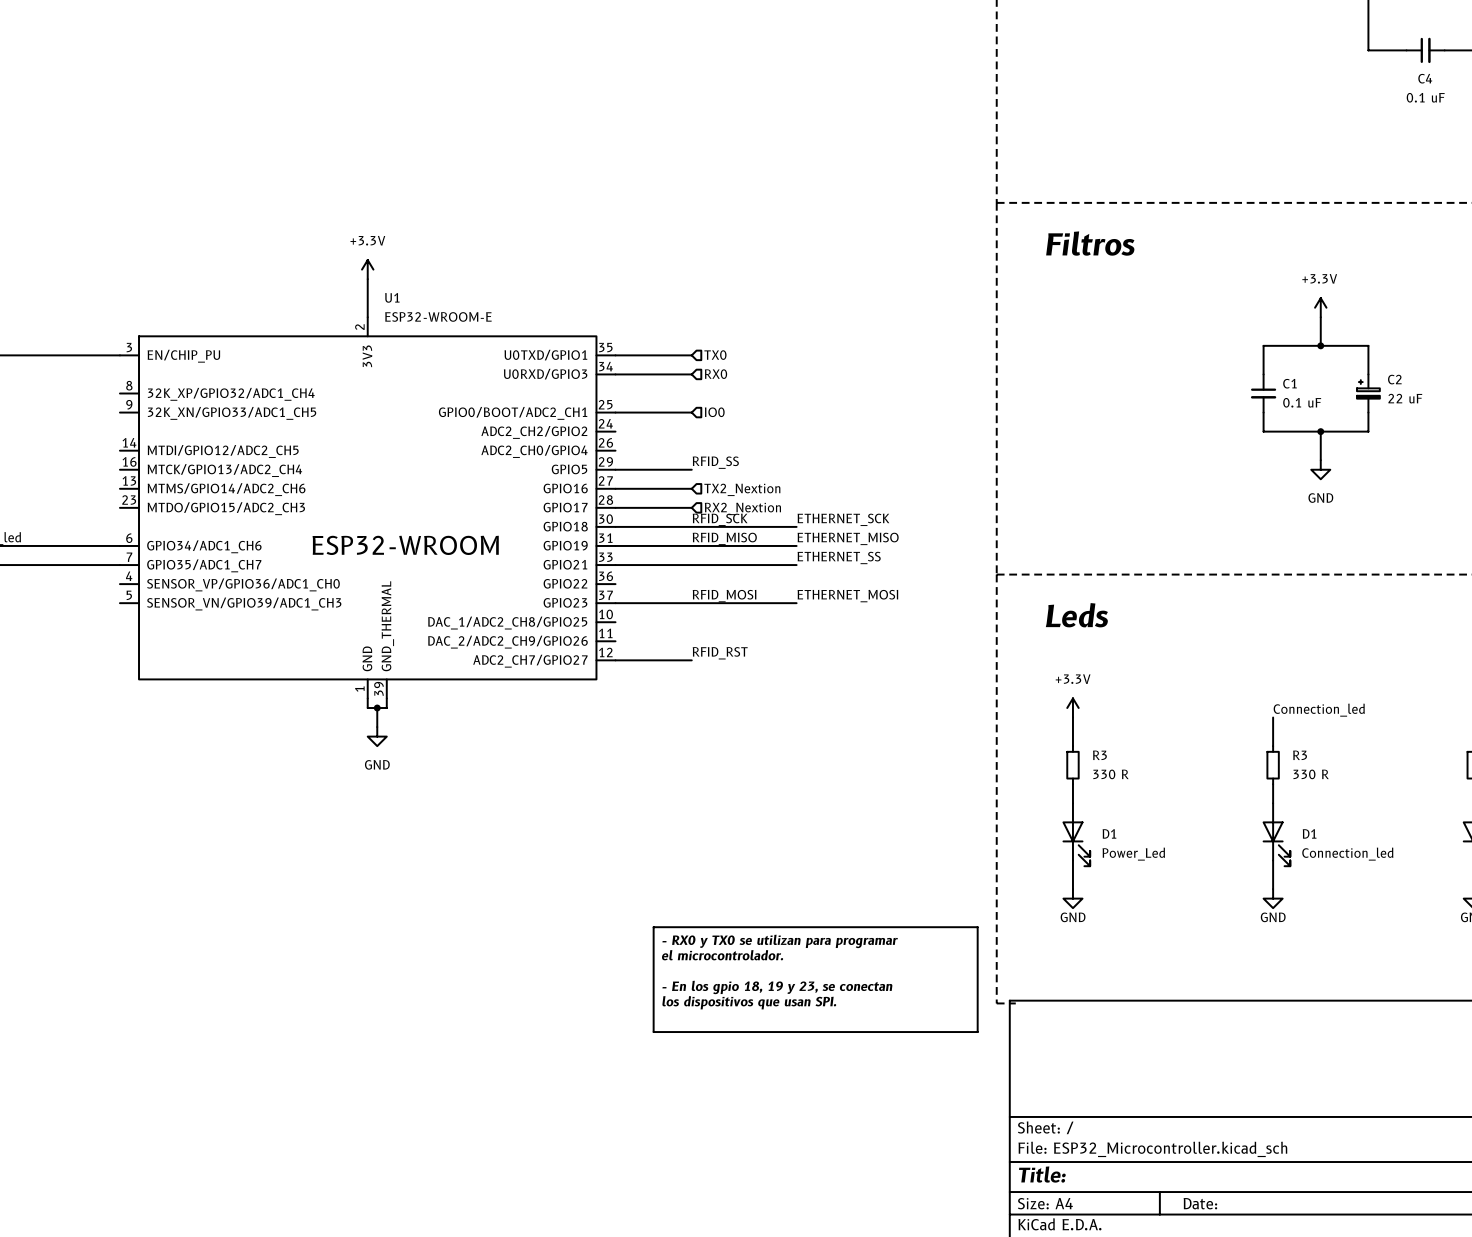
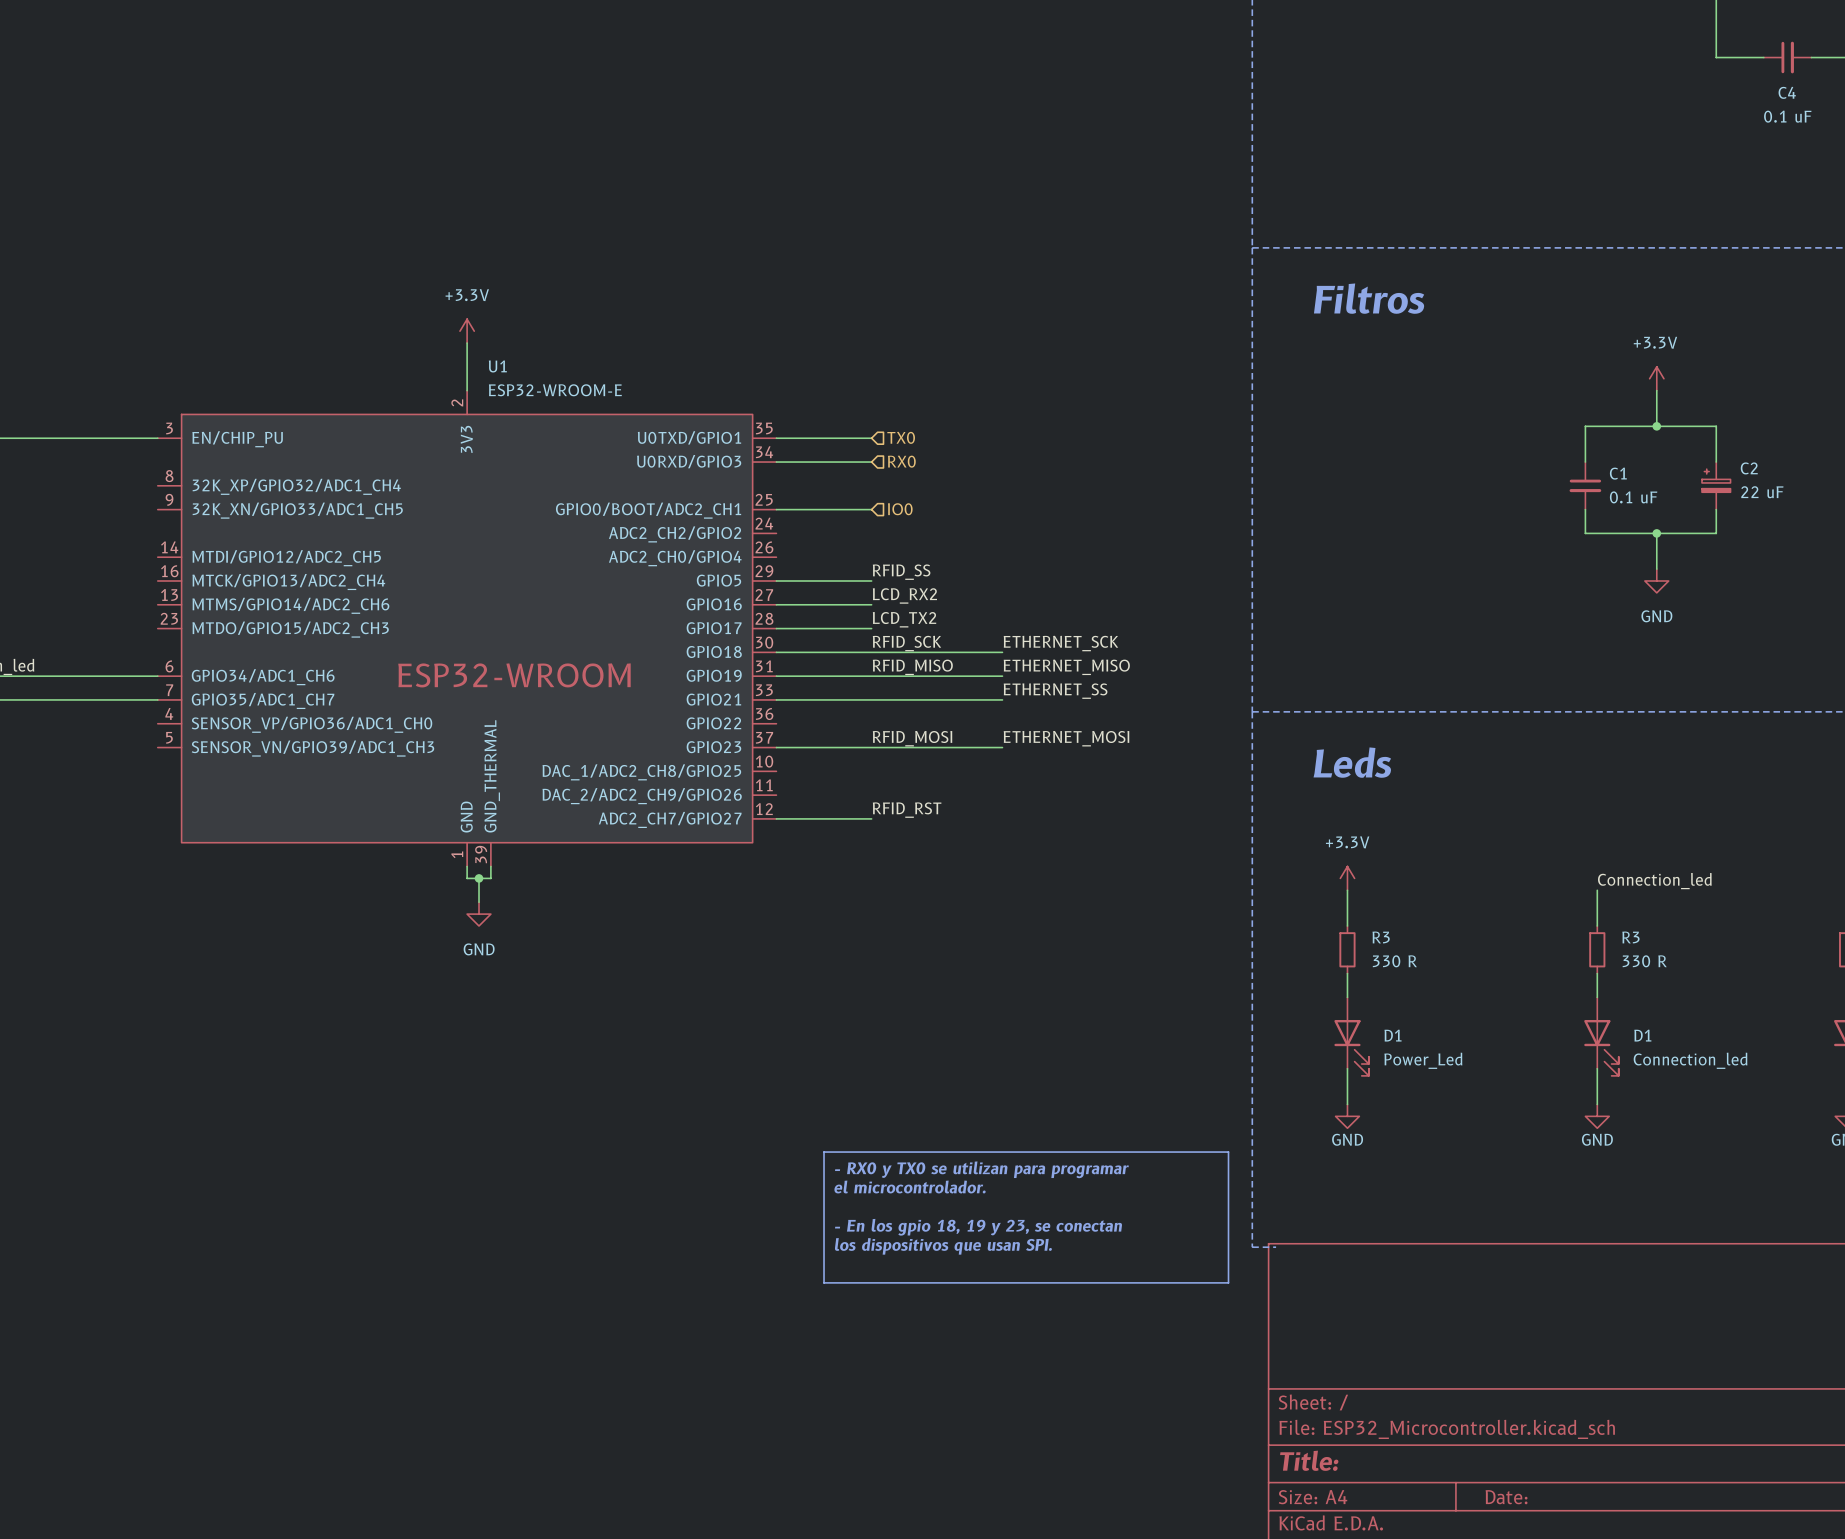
label: none -> LCD_RX2 (904, 595)
hierarchical label: TX2_Nextion (742, 489) -> none
label: none -> LCD_TX2 (904, 619)
hierarchical label: RX2_Nextion (742, 508) -> none

